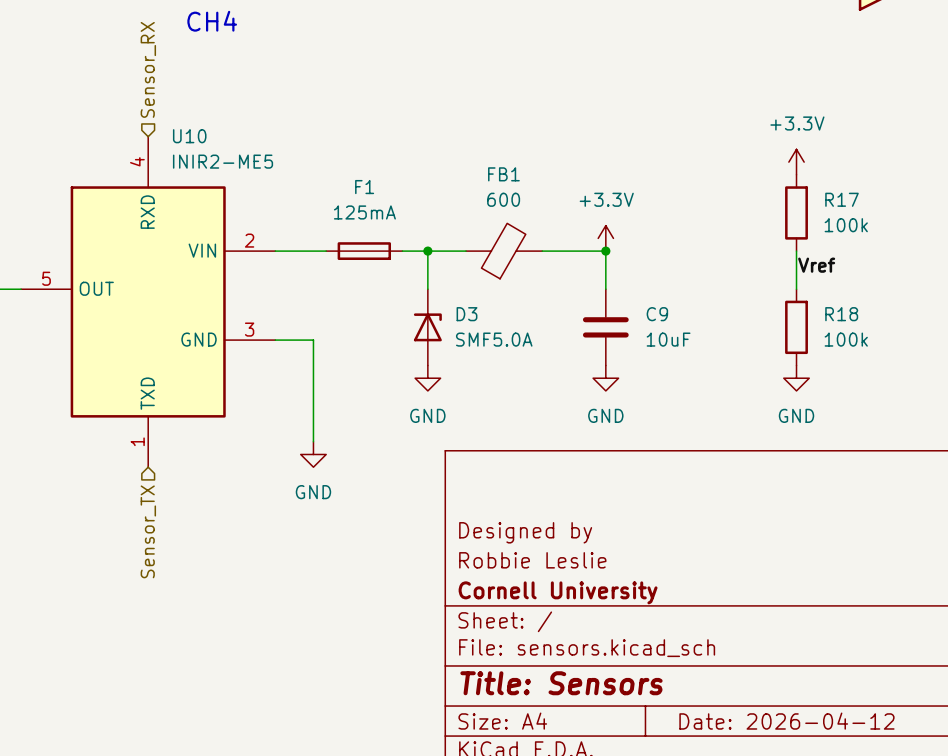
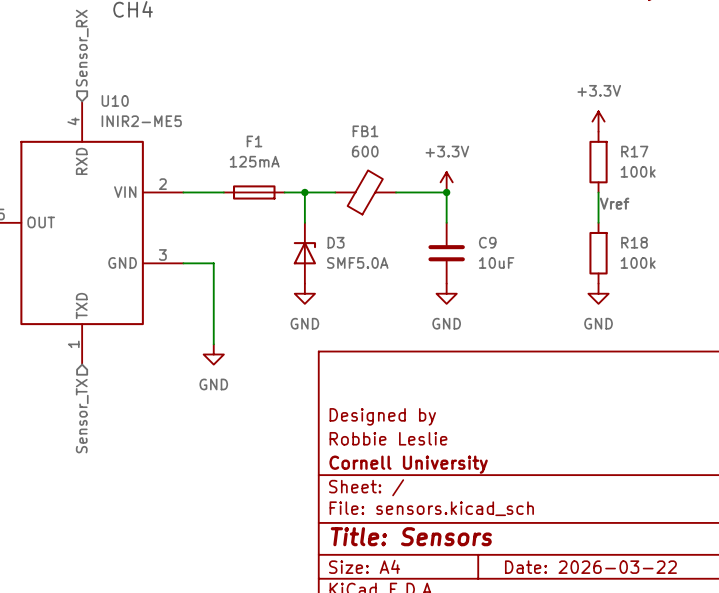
title block: Date: 2026-04-12 (786, 721) -> Date: 2026-03-22 (590, 567)

